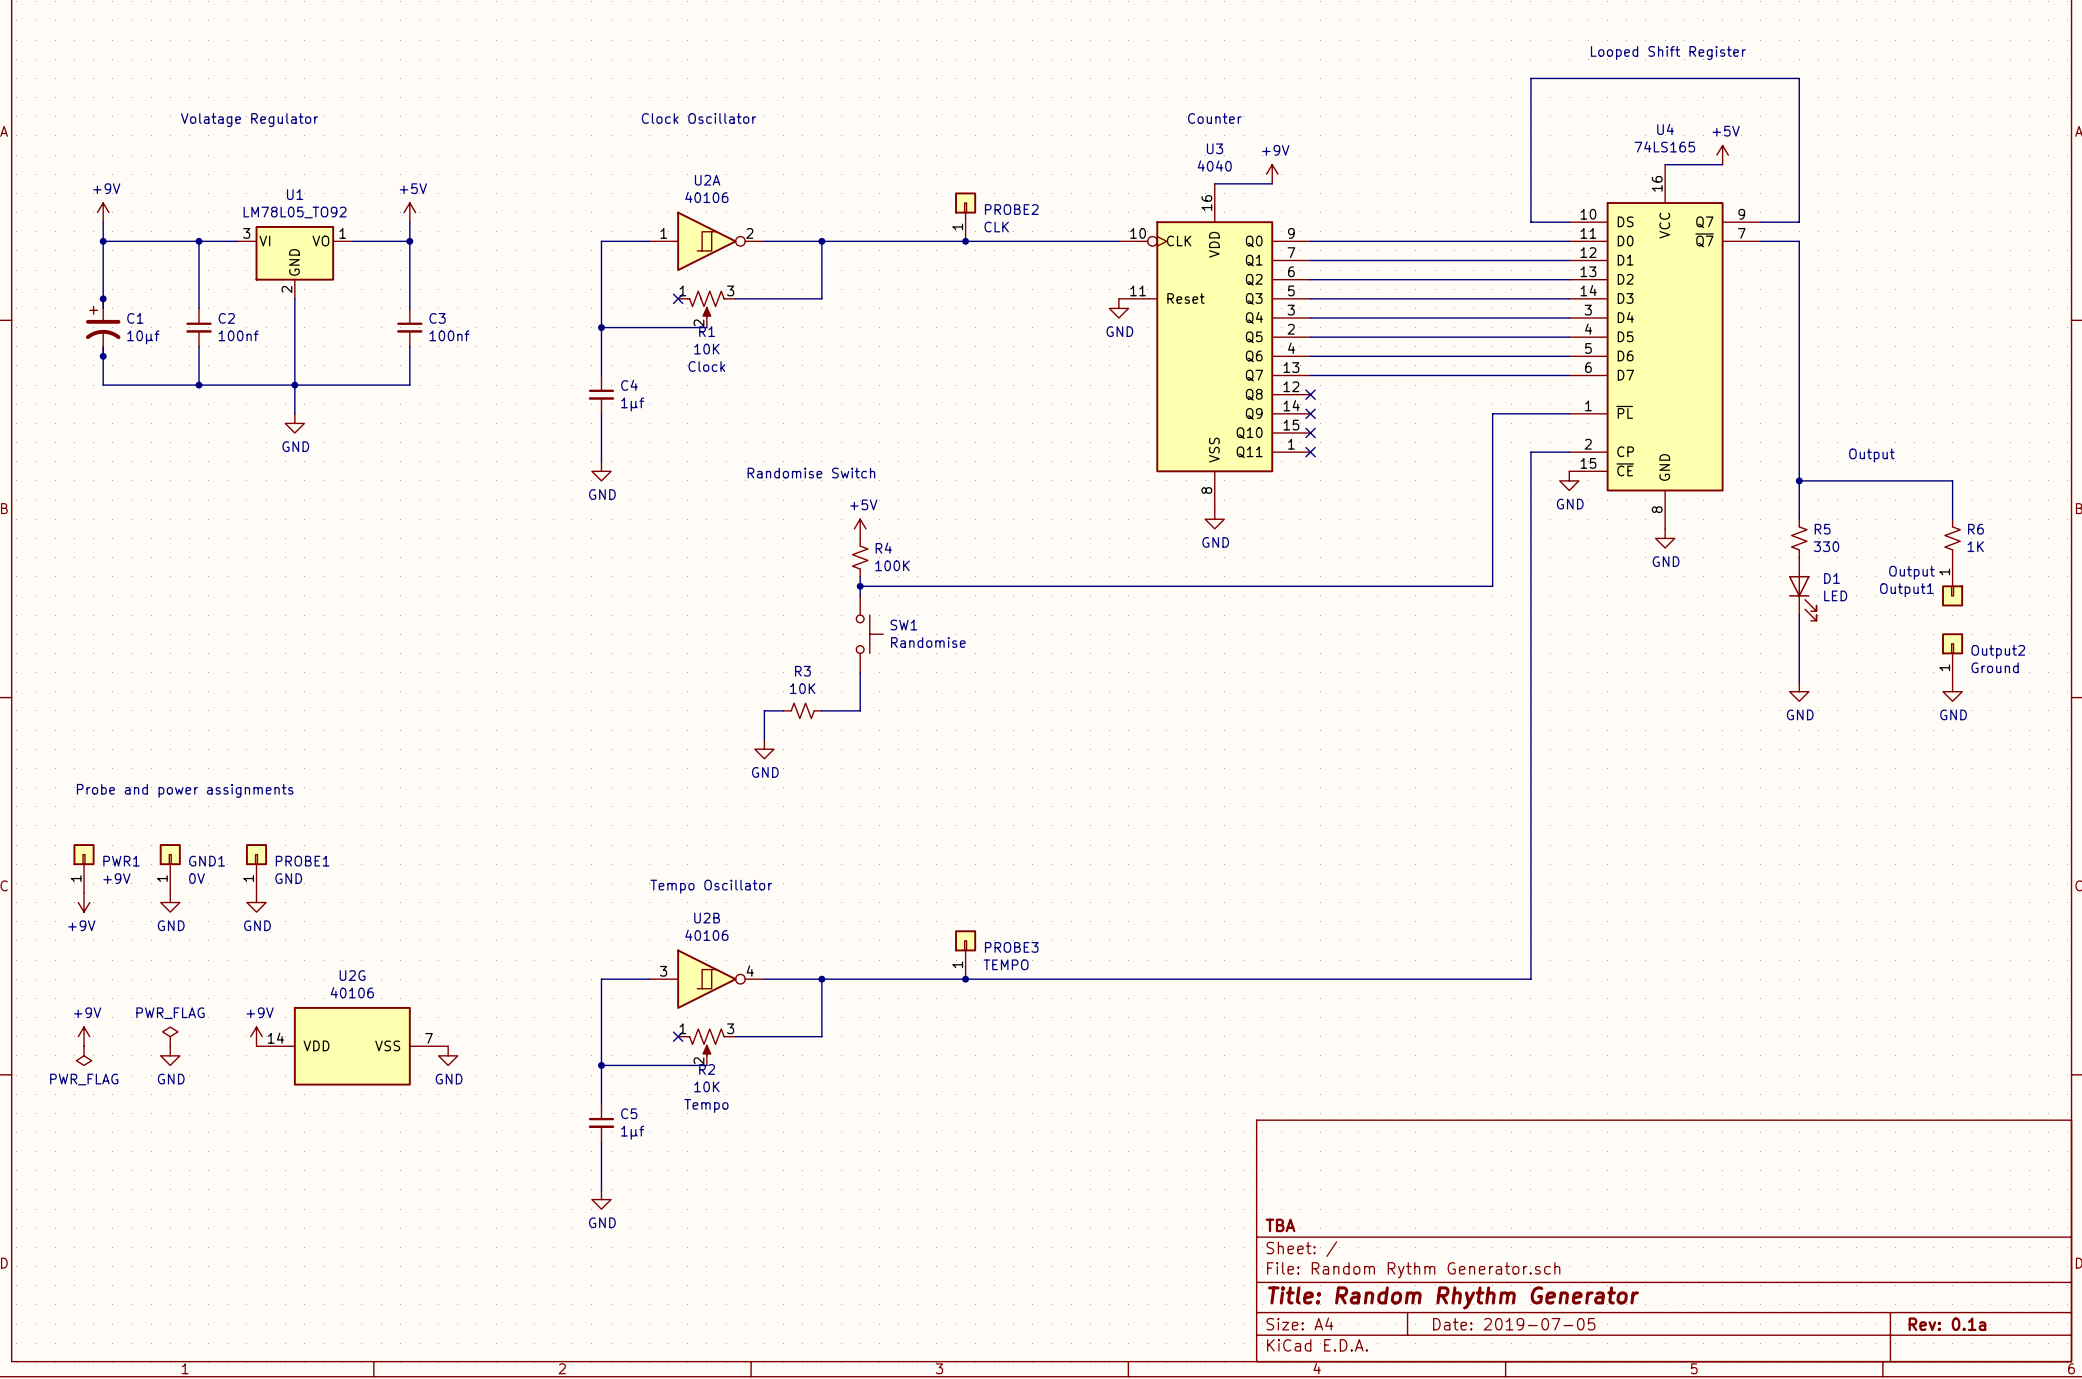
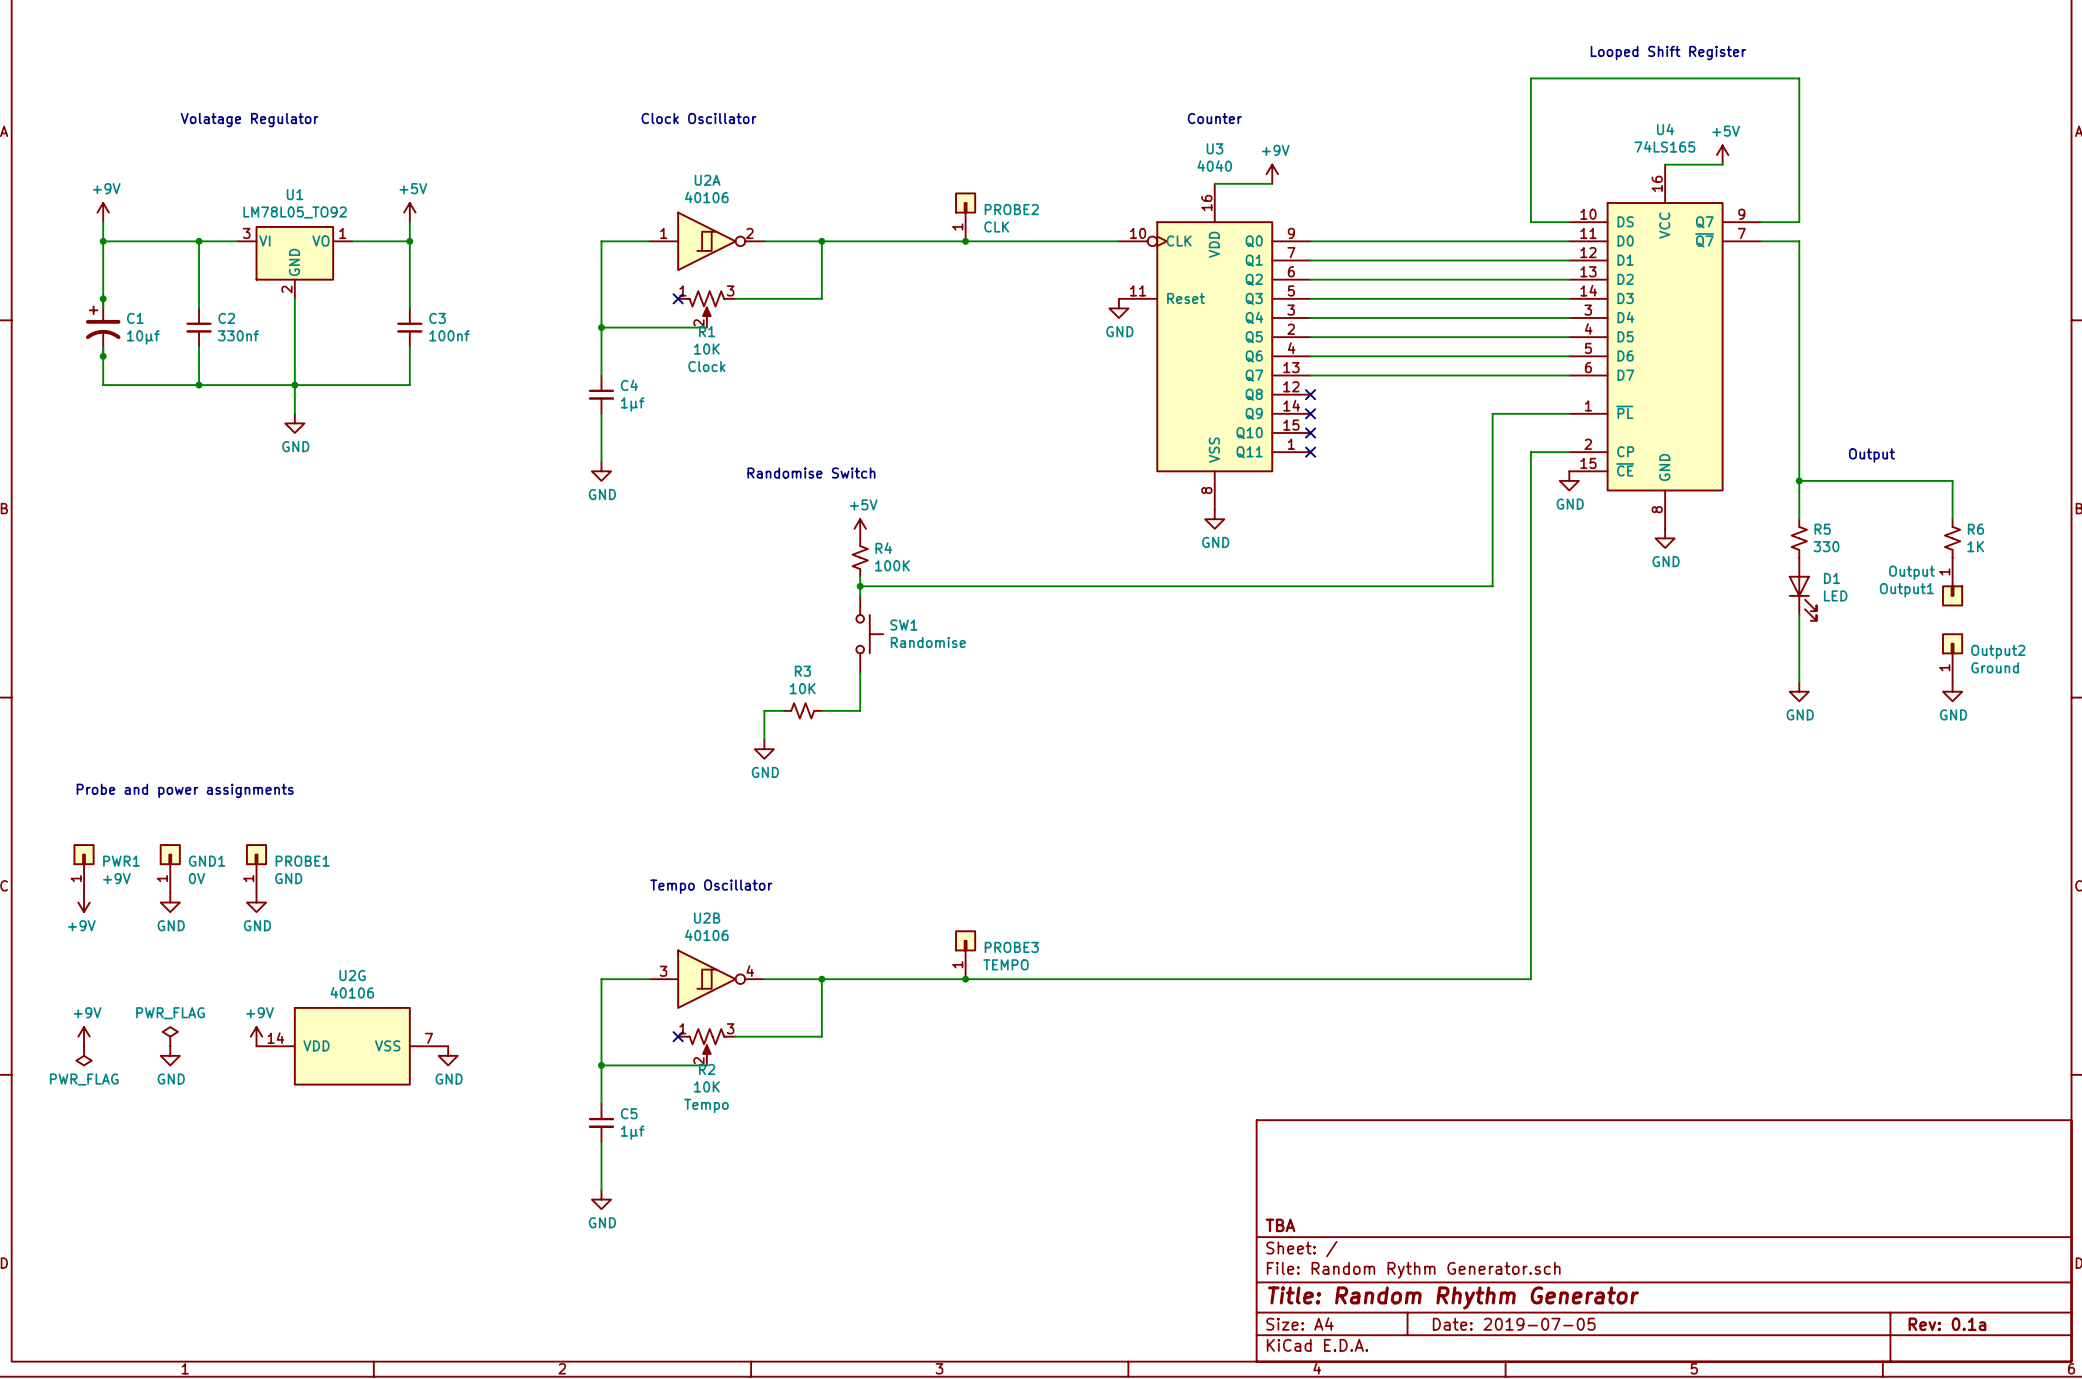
C2 value: 100nf (238, 335) -> 330nf (238, 335)

